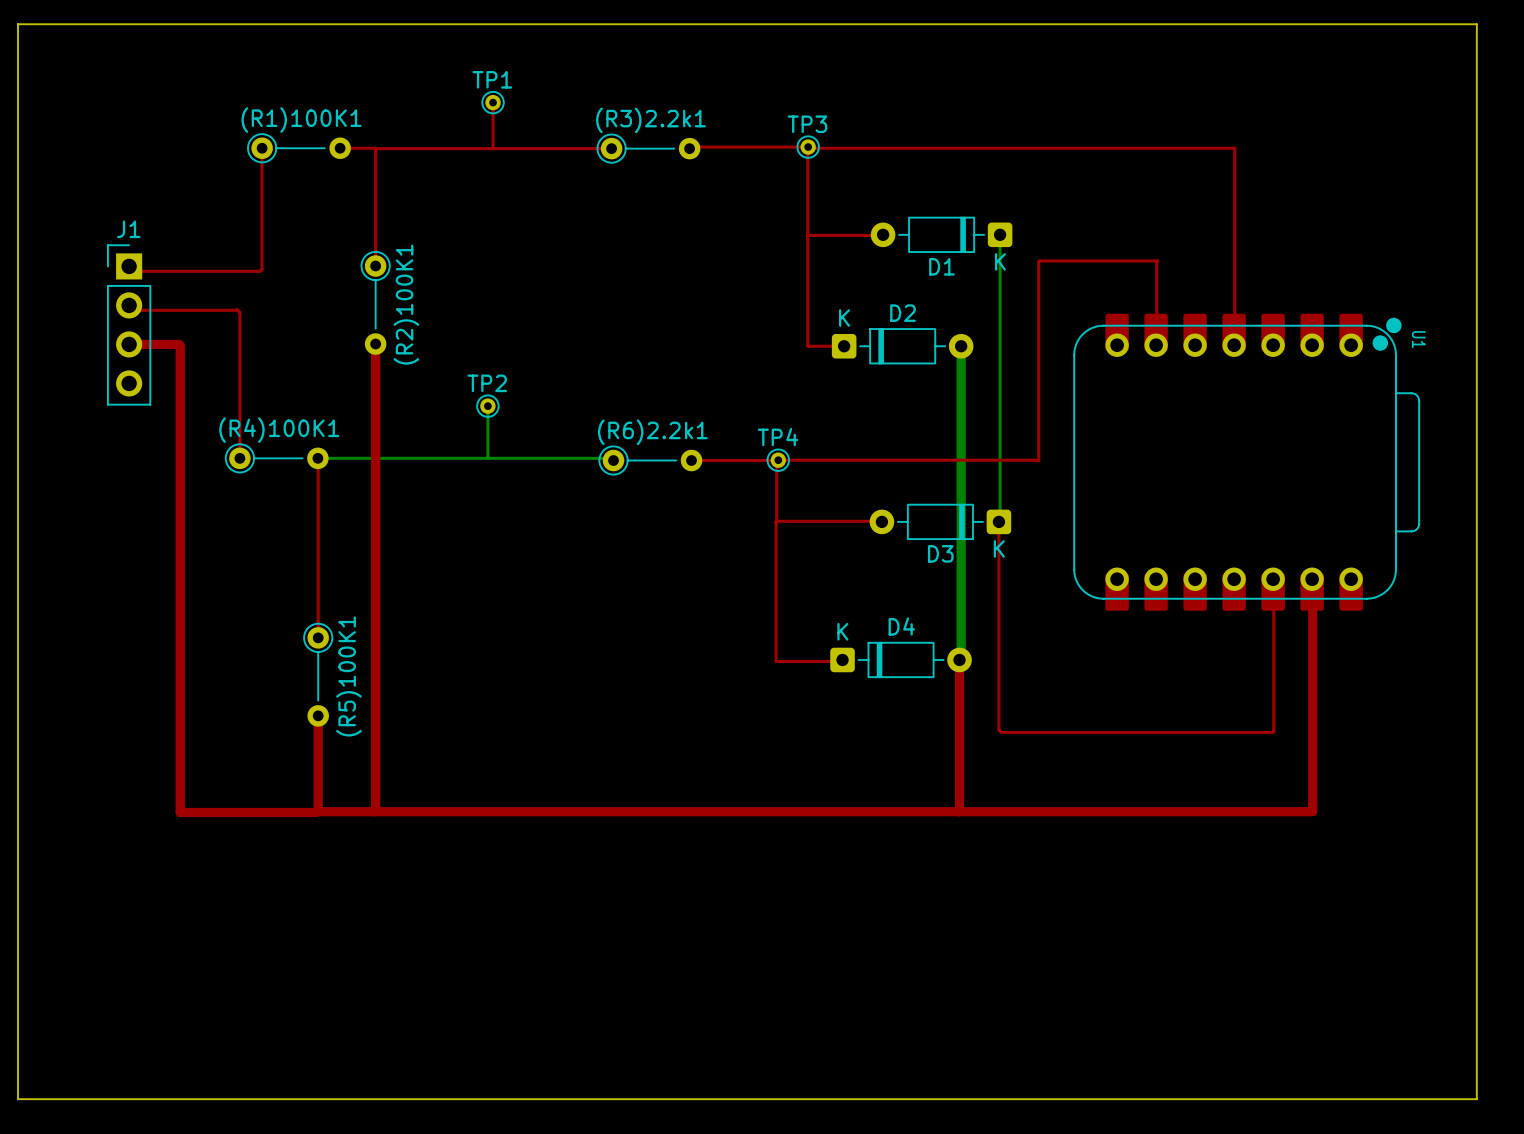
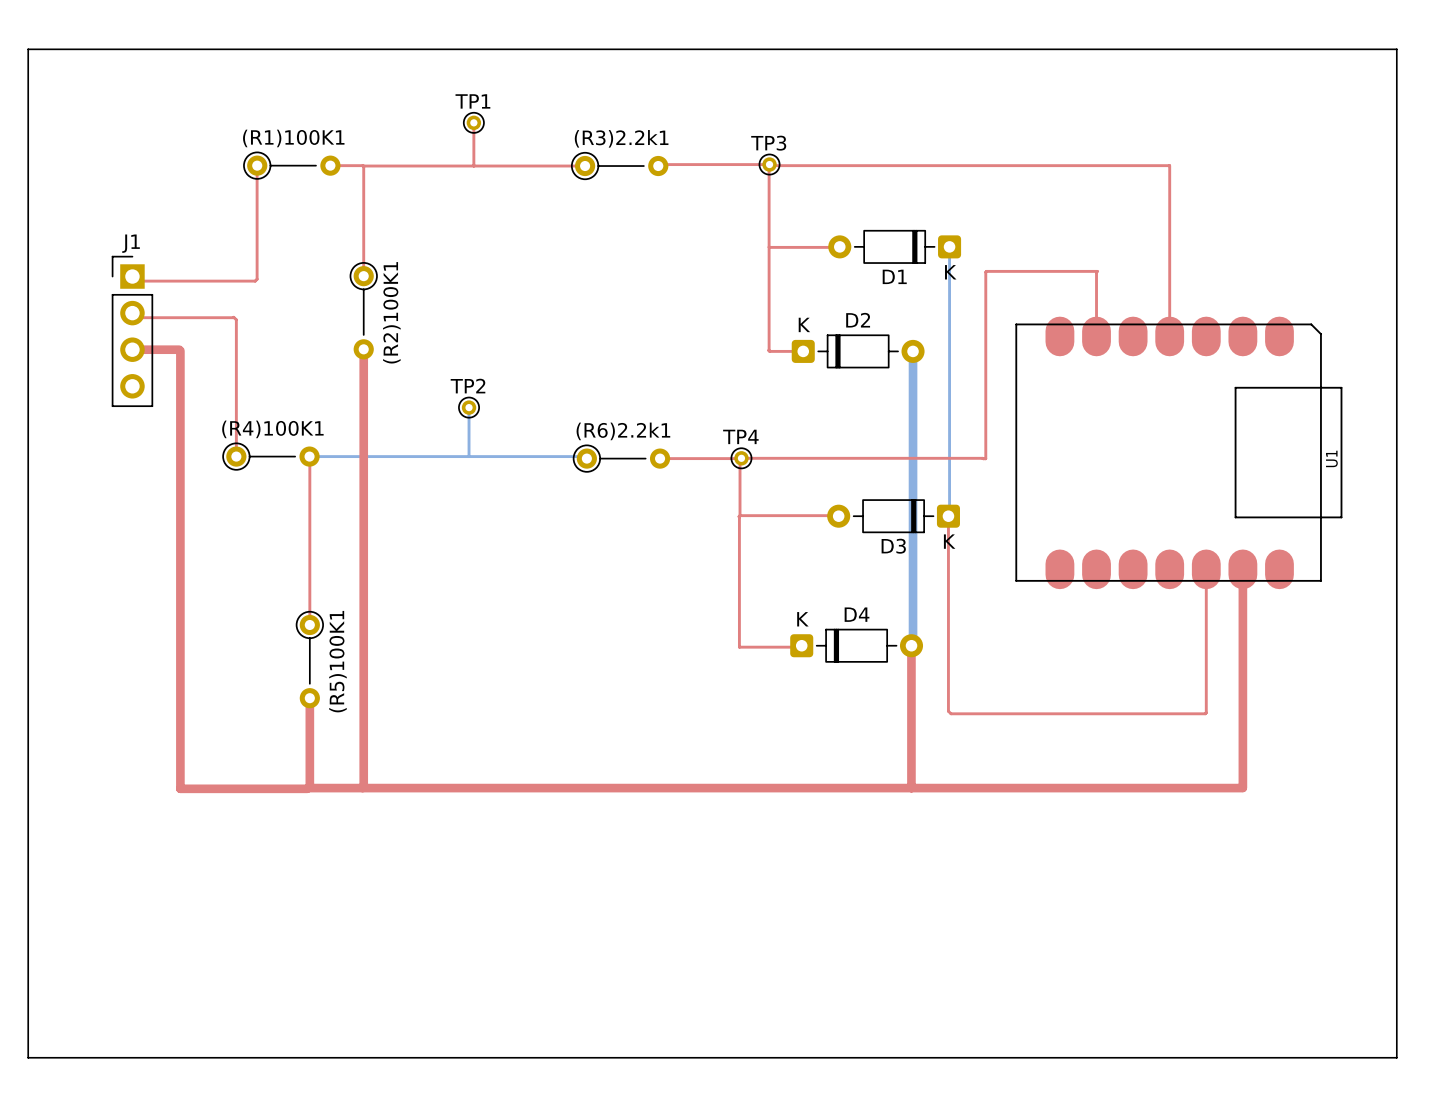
U1 footprint: [1073, 313, 1421, 611] -> [1015, 316, 1343, 590]
U1 name position: U1 (1418, 339) -> U1 (1331, 458)

